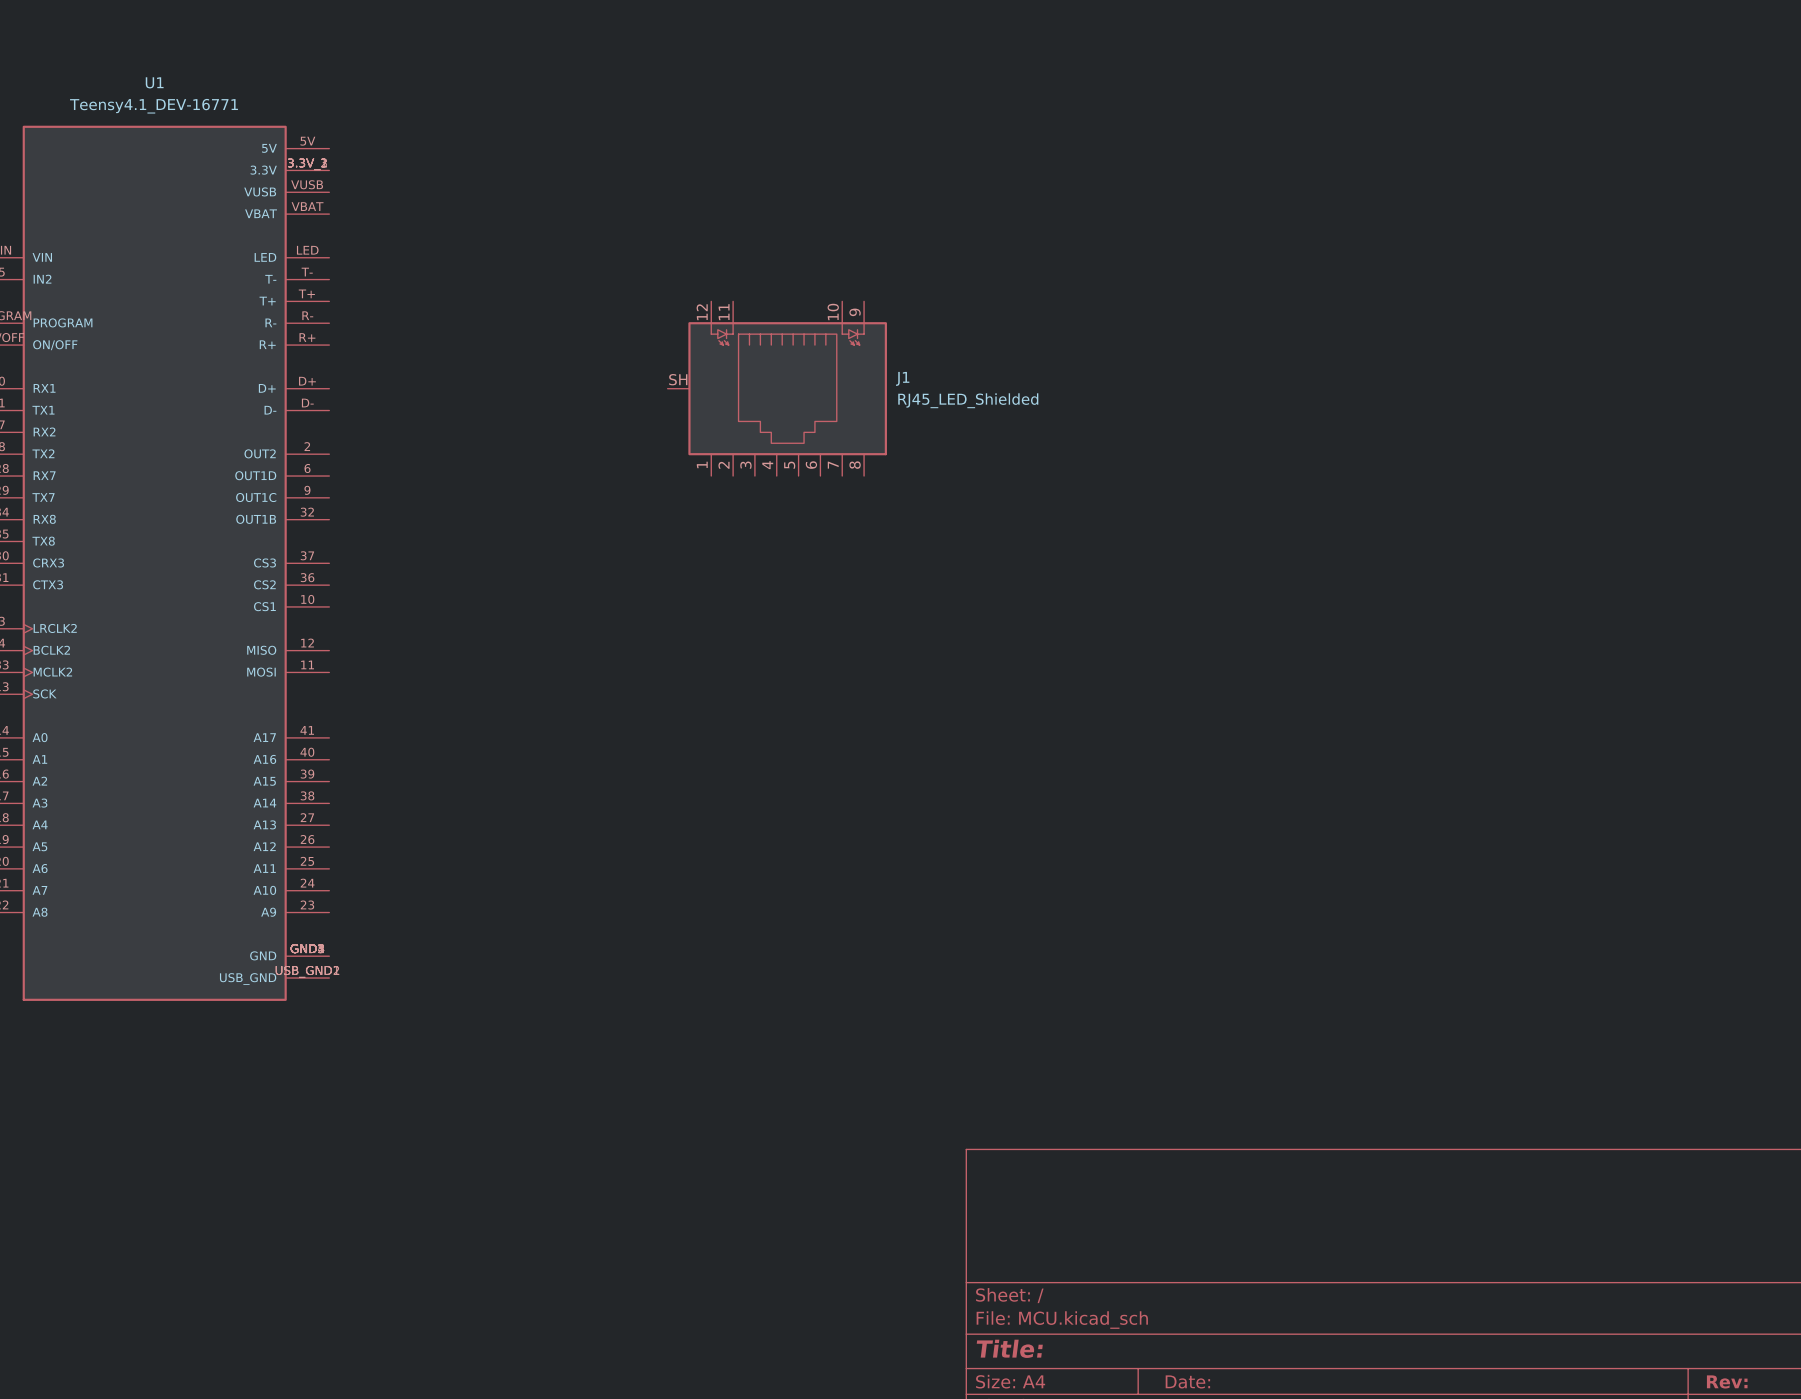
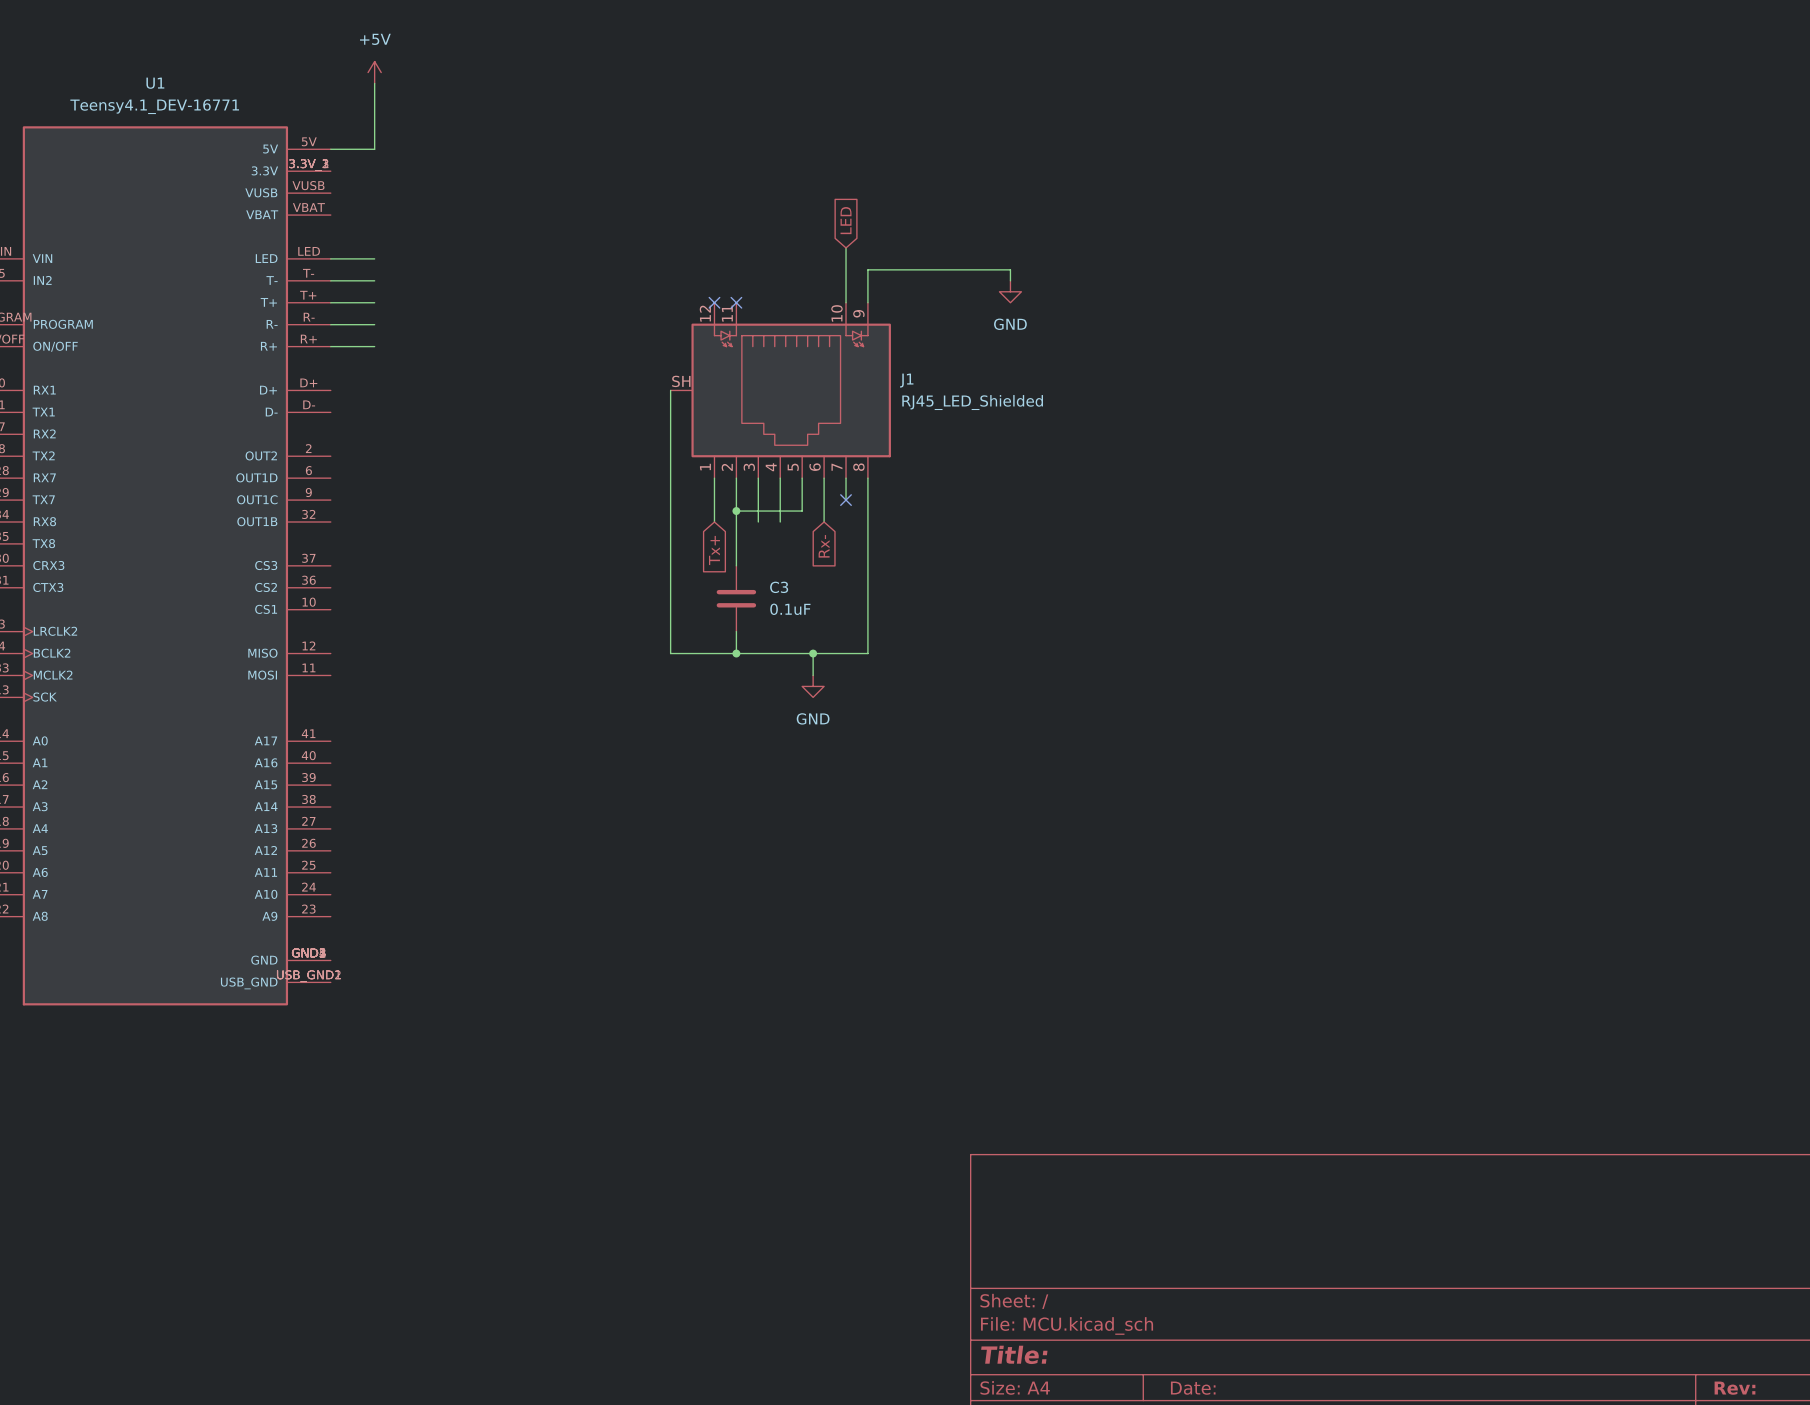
power symbol: none -> +5V (374, 72)
wire: none -> (374, 83) (374, 149) (330, 149)
global label: none -> LED (846, 220)
wire: none -> (846, 247) (846, 302)
wire: none -> (330, 258) (374, 258)
wire: none -> (330, 280) (374, 280)
wire: none -> (1010, 280) (1010, 269) (867, 269) (867, 302)
power symbol: none -> GND (1010, 291)
wire: none -> (330, 302) (374, 302)
no-connect mark: none -> (714, 302)
no-connect mark: none -> (736, 302)
wire: none -> (330, 324) (374, 324)
wire: none -> (330, 346) (374, 346)
wire: none -> (670, 390) (670, 653) (867, 653) (867, 478)
wire: none -> (714, 478) (714, 521)
wire: none -> (736, 478) (736, 565)
wire: none -> (758, 478) (758, 521)
wire: none -> (780, 478) (780, 521)
wire: none -> (802, 478) (802, 511) (736, 511)
wire: none -> (824, 478) (824, 521)
wire: none -> (846, 478) (846, 500)
no-connect mark: none -> (846, 500)
junction: none -> (736, 511)
global label: none -> Rx- (824, 546)
global label: none -> Tx+ (714, 550)
C3: none -> 0.1uF (736, 598)
wire: none -> (736, 631) (736, 653)
junction: none -> (736, 653)
wire: none -> (813, 653) (813, 675)
junction: none -> (813, 653)
power symbol: none -> GND (813, 686)

